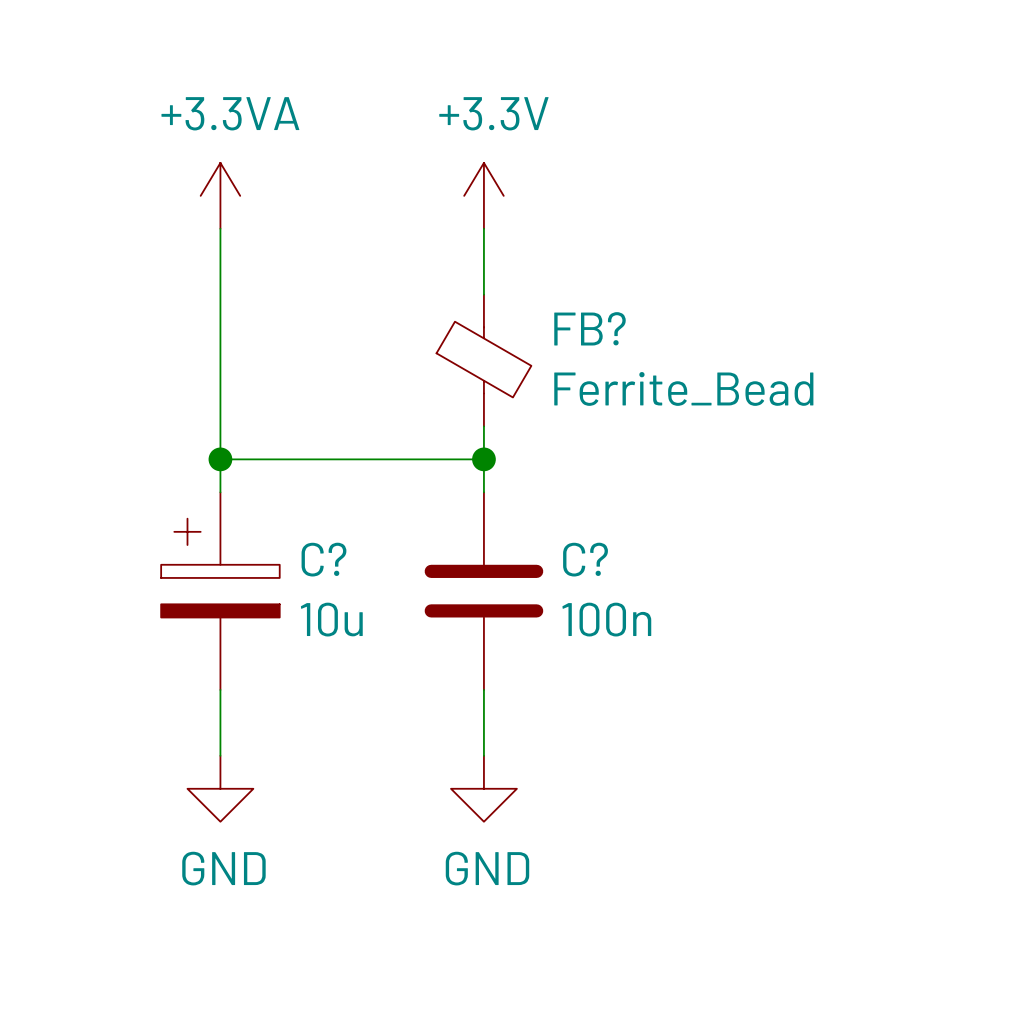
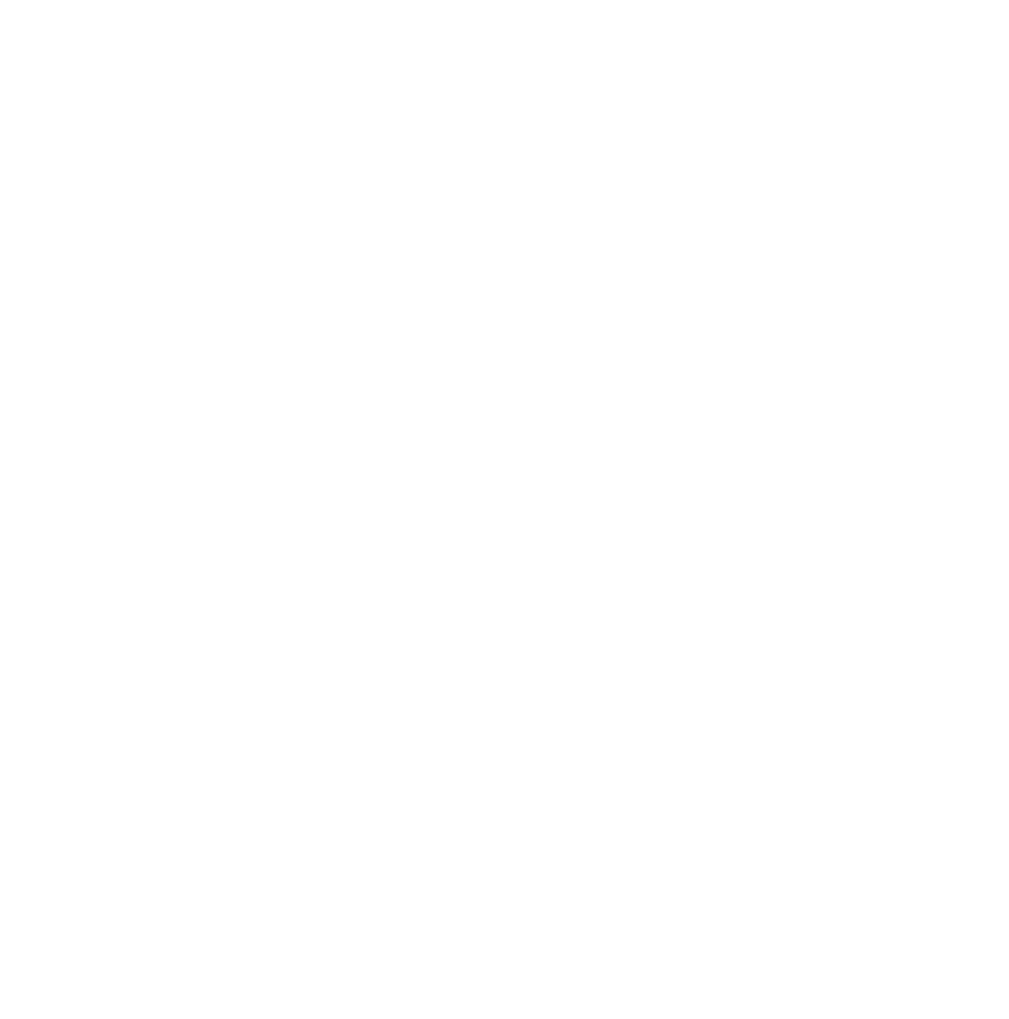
power symbol: +3.3VA (220, 195) -> none
power symbol: +3.3V (483, 195) -> none
wire: (220, 228) (220, 492) -> none
wire: (483, 228) (483, 294) -> none
FB?: Ferrite_Bead (483, 360) -> none
wire: (483, 426) (483, 492) -> none
wire: (220, 459) (483, 459) -> none
junction: (220, 459) -> none
junction: (483, 459) -> none
C?: 10u (220, 591) -> none
C?: 100n (483, 591) -> none
wire: (220, 689) (220, 755) -> none
wire: (483, 689) (483, 755) -> none
power symbol: GND (220, 788) -> none
power symbol: GND (483, 788) -> none

